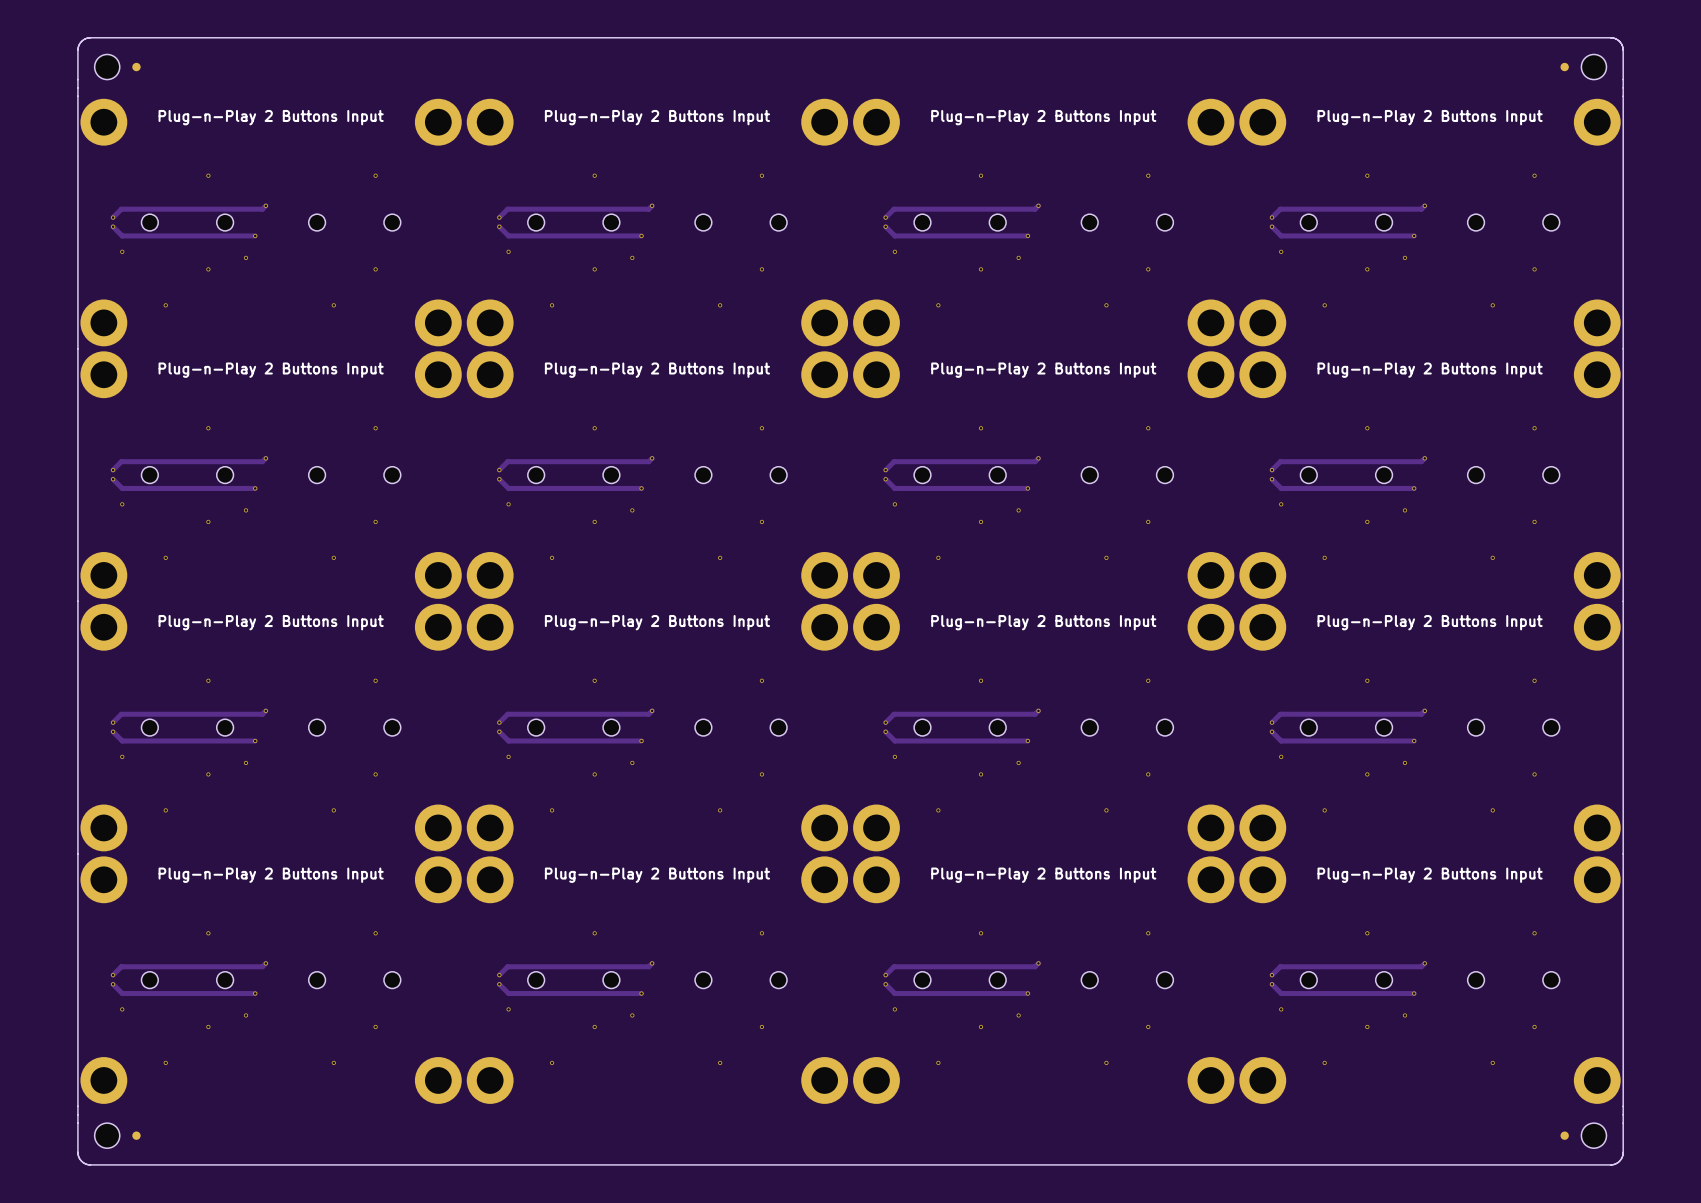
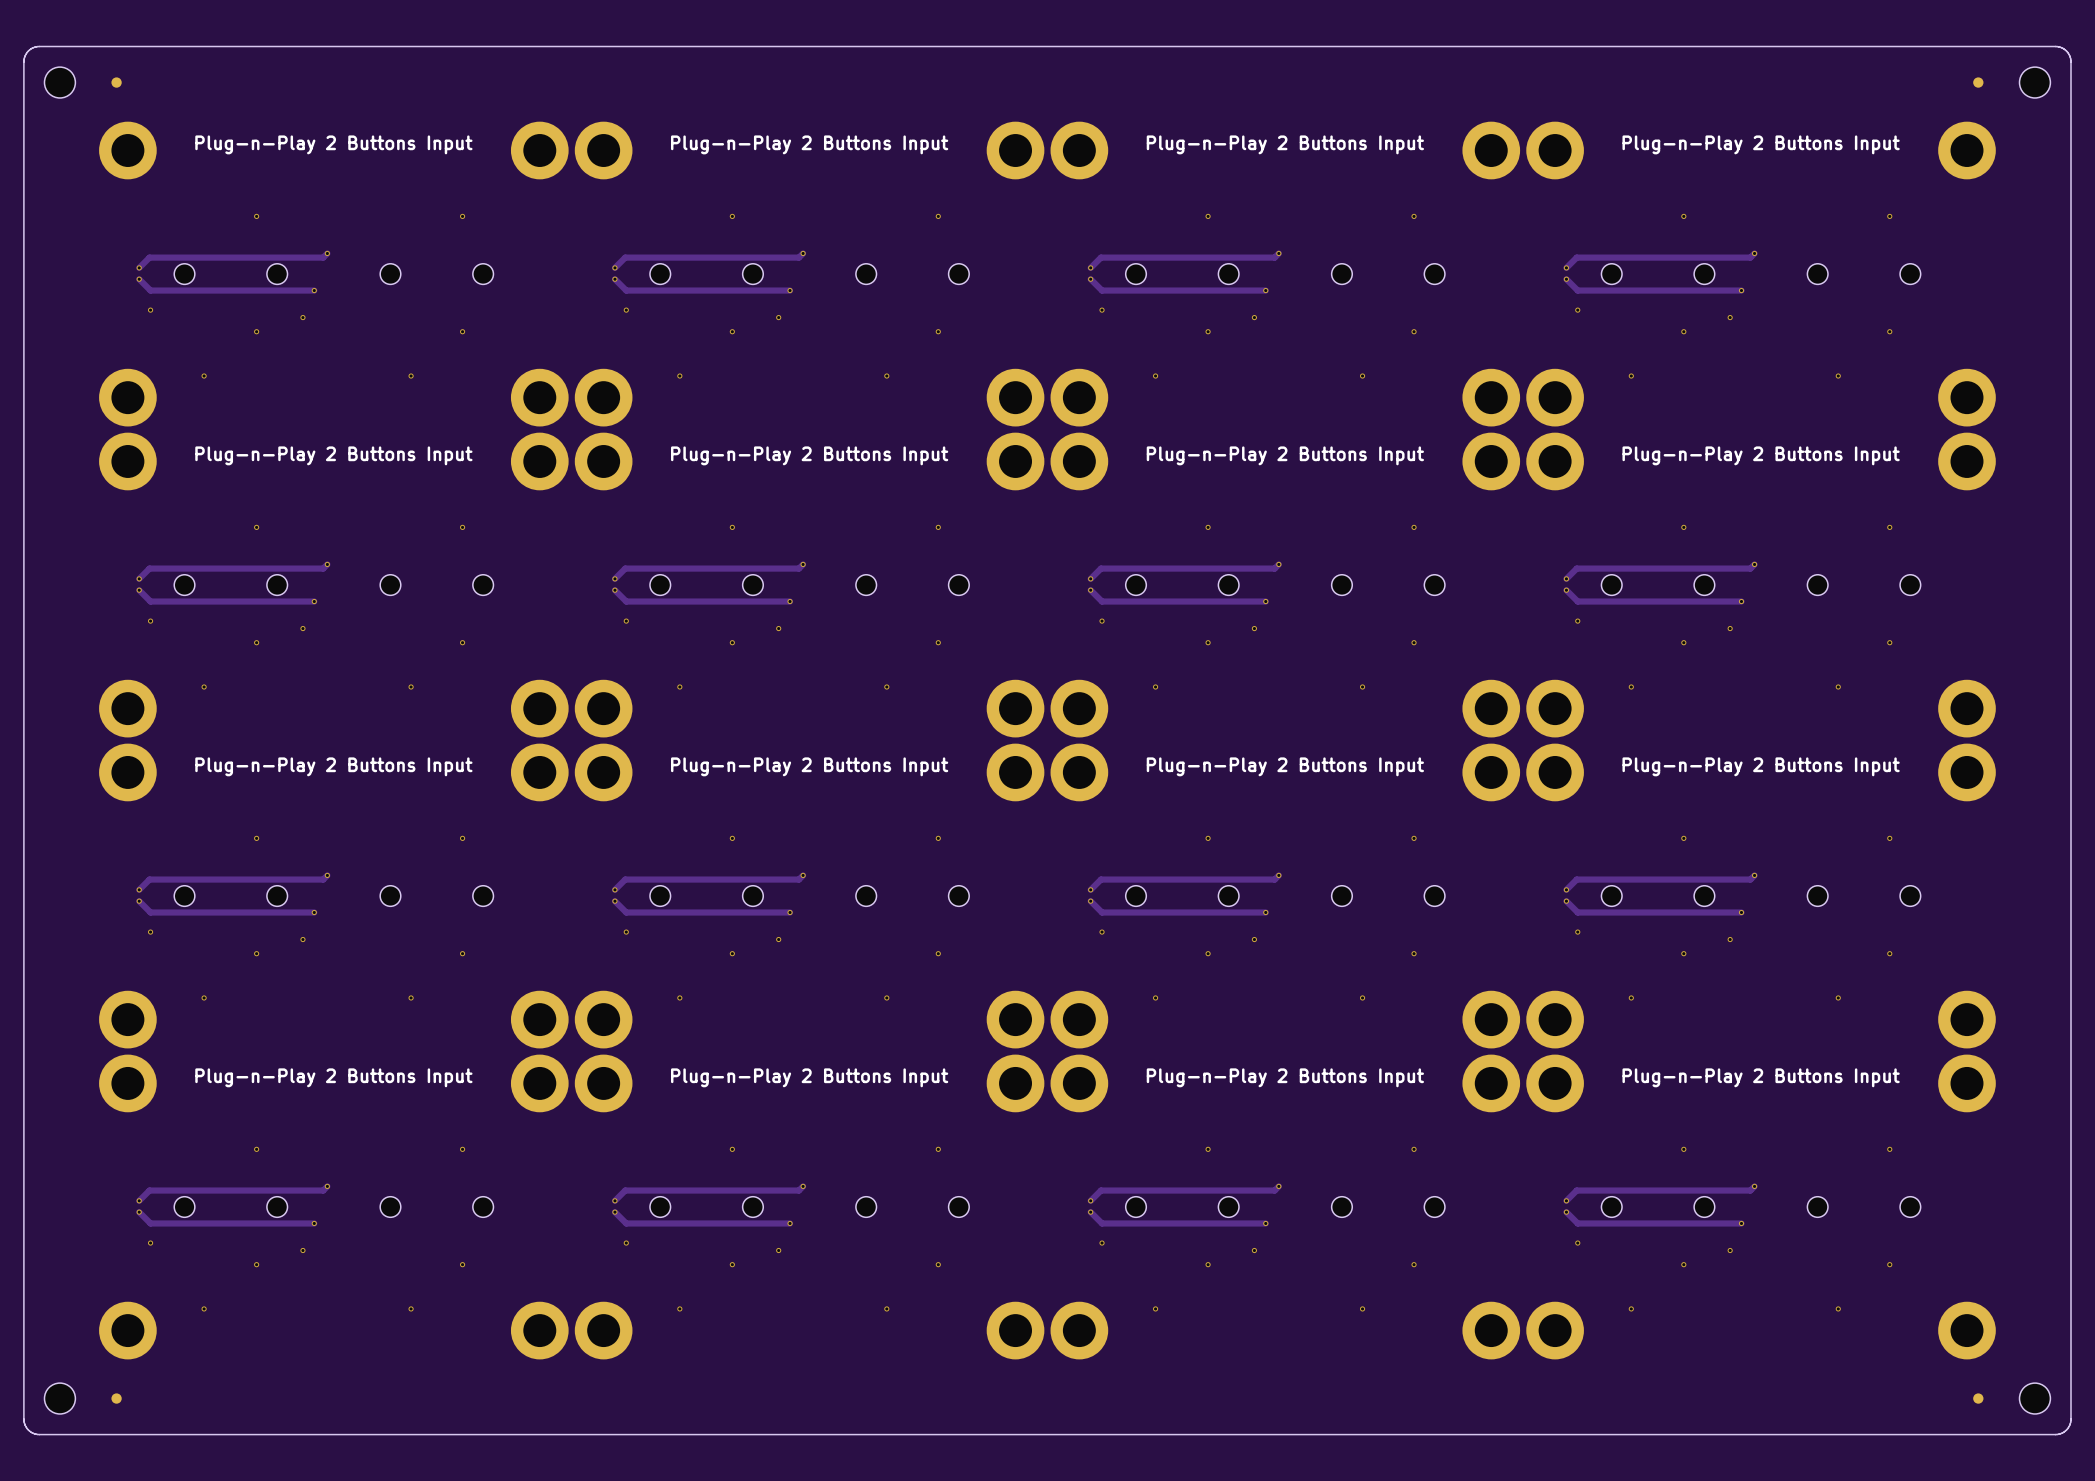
board edge: (90, 37) (81, 41) (77, 50) (77, 1152) (81, 1161) (90, 1164) -> (111, 46) (36, 46) (27, 52) (23, 61) (23, 1420) (28, 1430) (36, 1434) (111, 1434)
board edge: (1610, 37) (1619, 41) (1623, 50) (1623, 1152) (1619, 1161) (1610, 1164) -> (1983, 46) (2058, 46) (2067, 52) (2071, 61) (2070, 1420) (2066, 1430) (2058, 1434) (1983, 1434)
part position: (107, 67) -> (59, 82)
part position: (136, 67) -> (116, 82)
part position: (1564, 67) -> (1978, 82)
part position: (1593, 67) -> (2034, 82)
part position: (107, 1135) -> (59, 1398)
part position: (136, 1135) -> (116, 1398)
part position: (1564, 1135) -> (1978, 1398)
part position: (1593, 1135) -> (2034, 1398)

